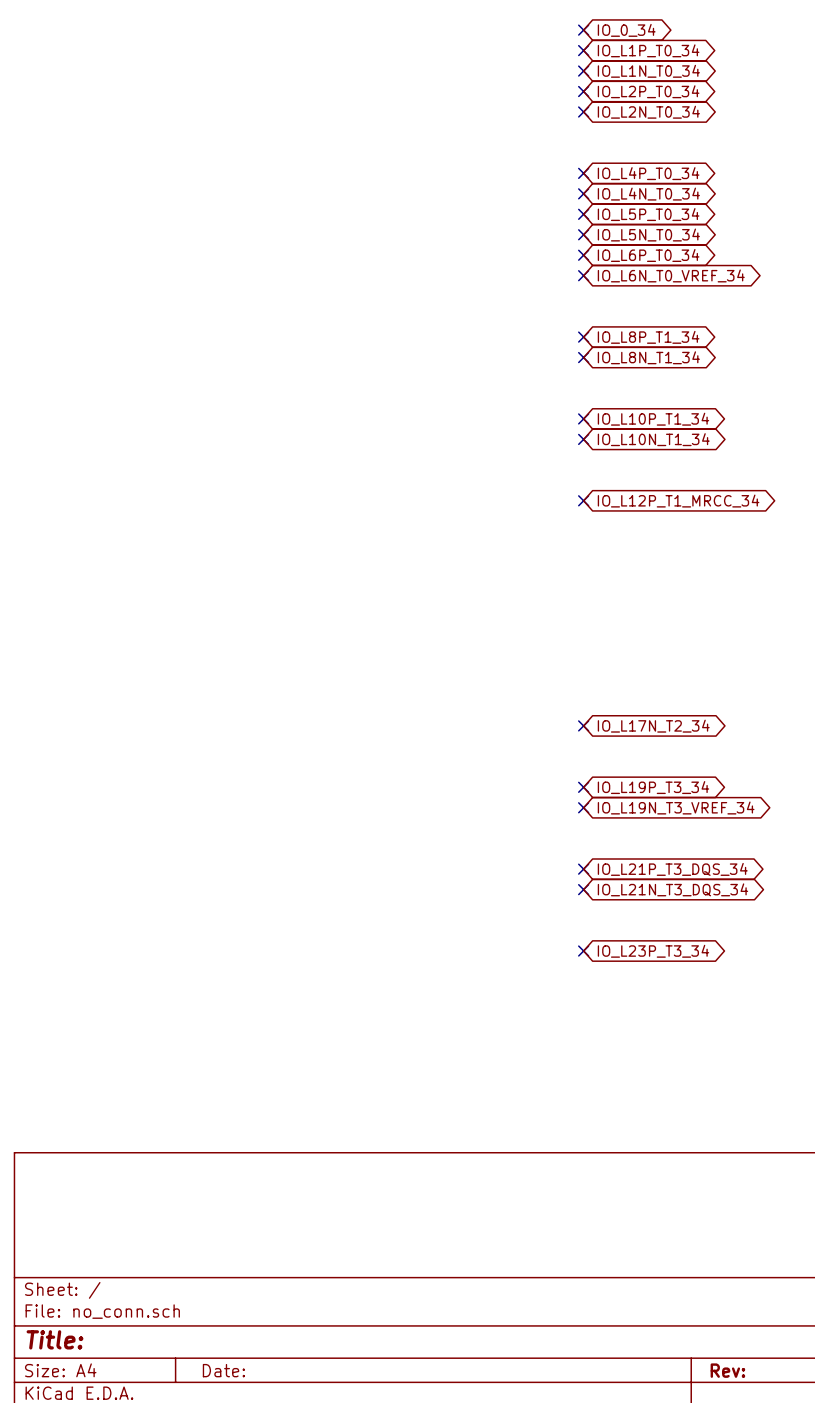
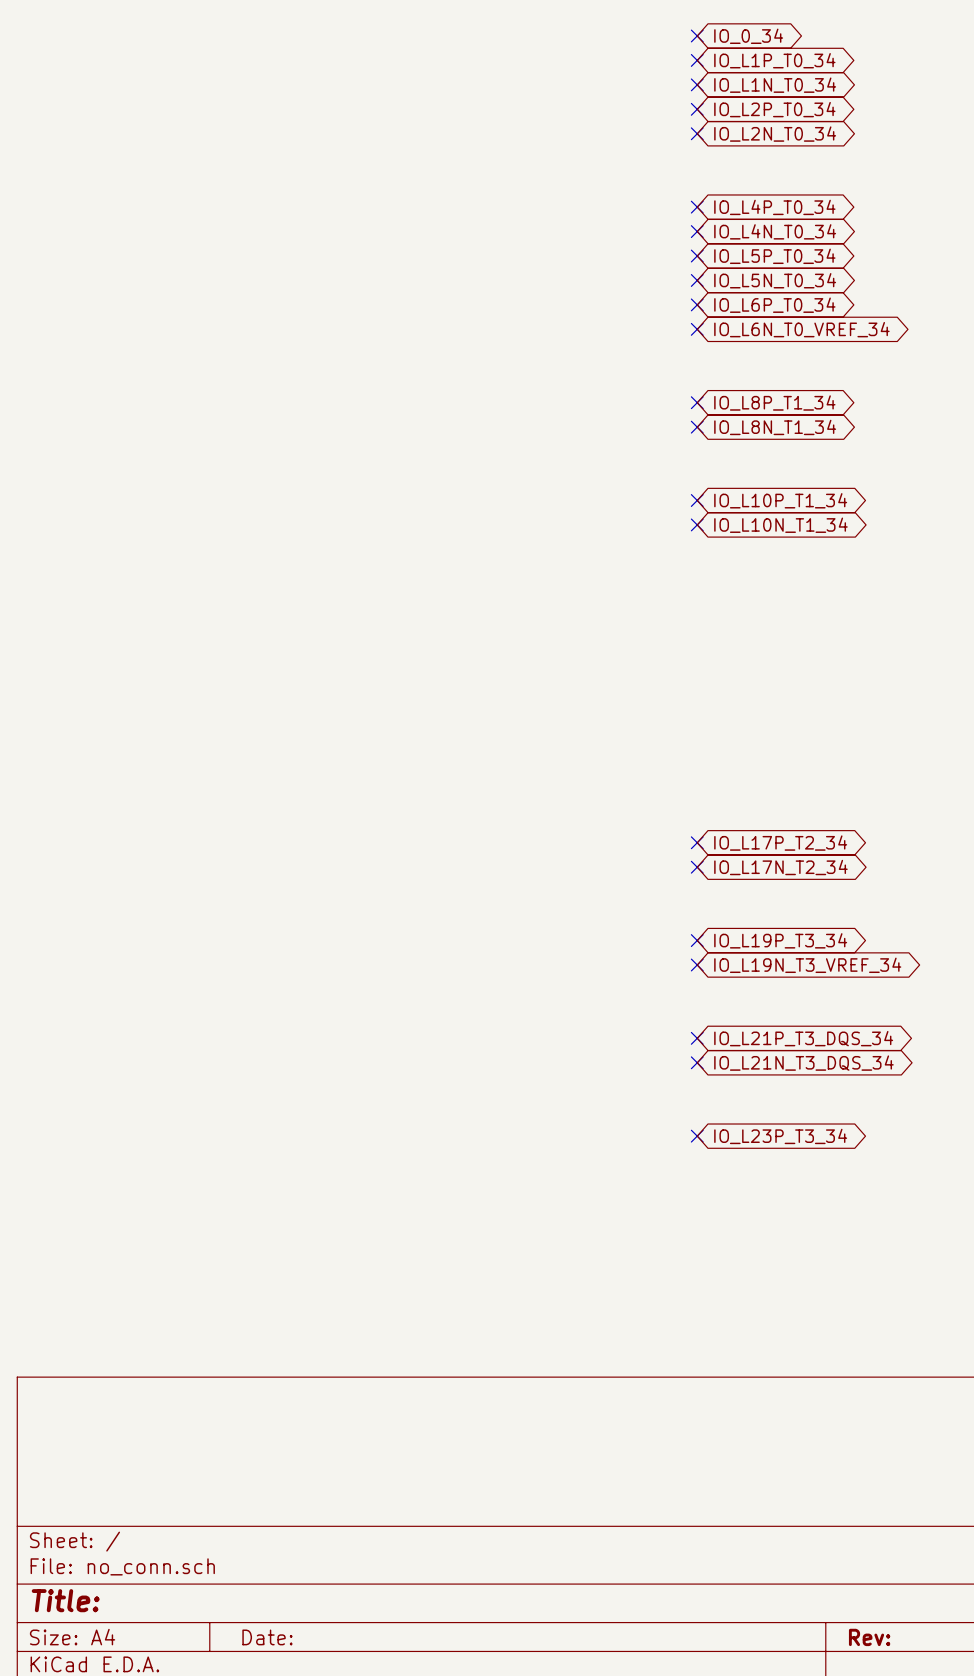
no-connect mark: (583, 500) -> none
global label: IO_L12P_T1_MRCC_34 (678, 501) -> none
no-connect mark: none -> (697, 842)
global label: none -> IO_L17P_T2_34 (780, 843)

